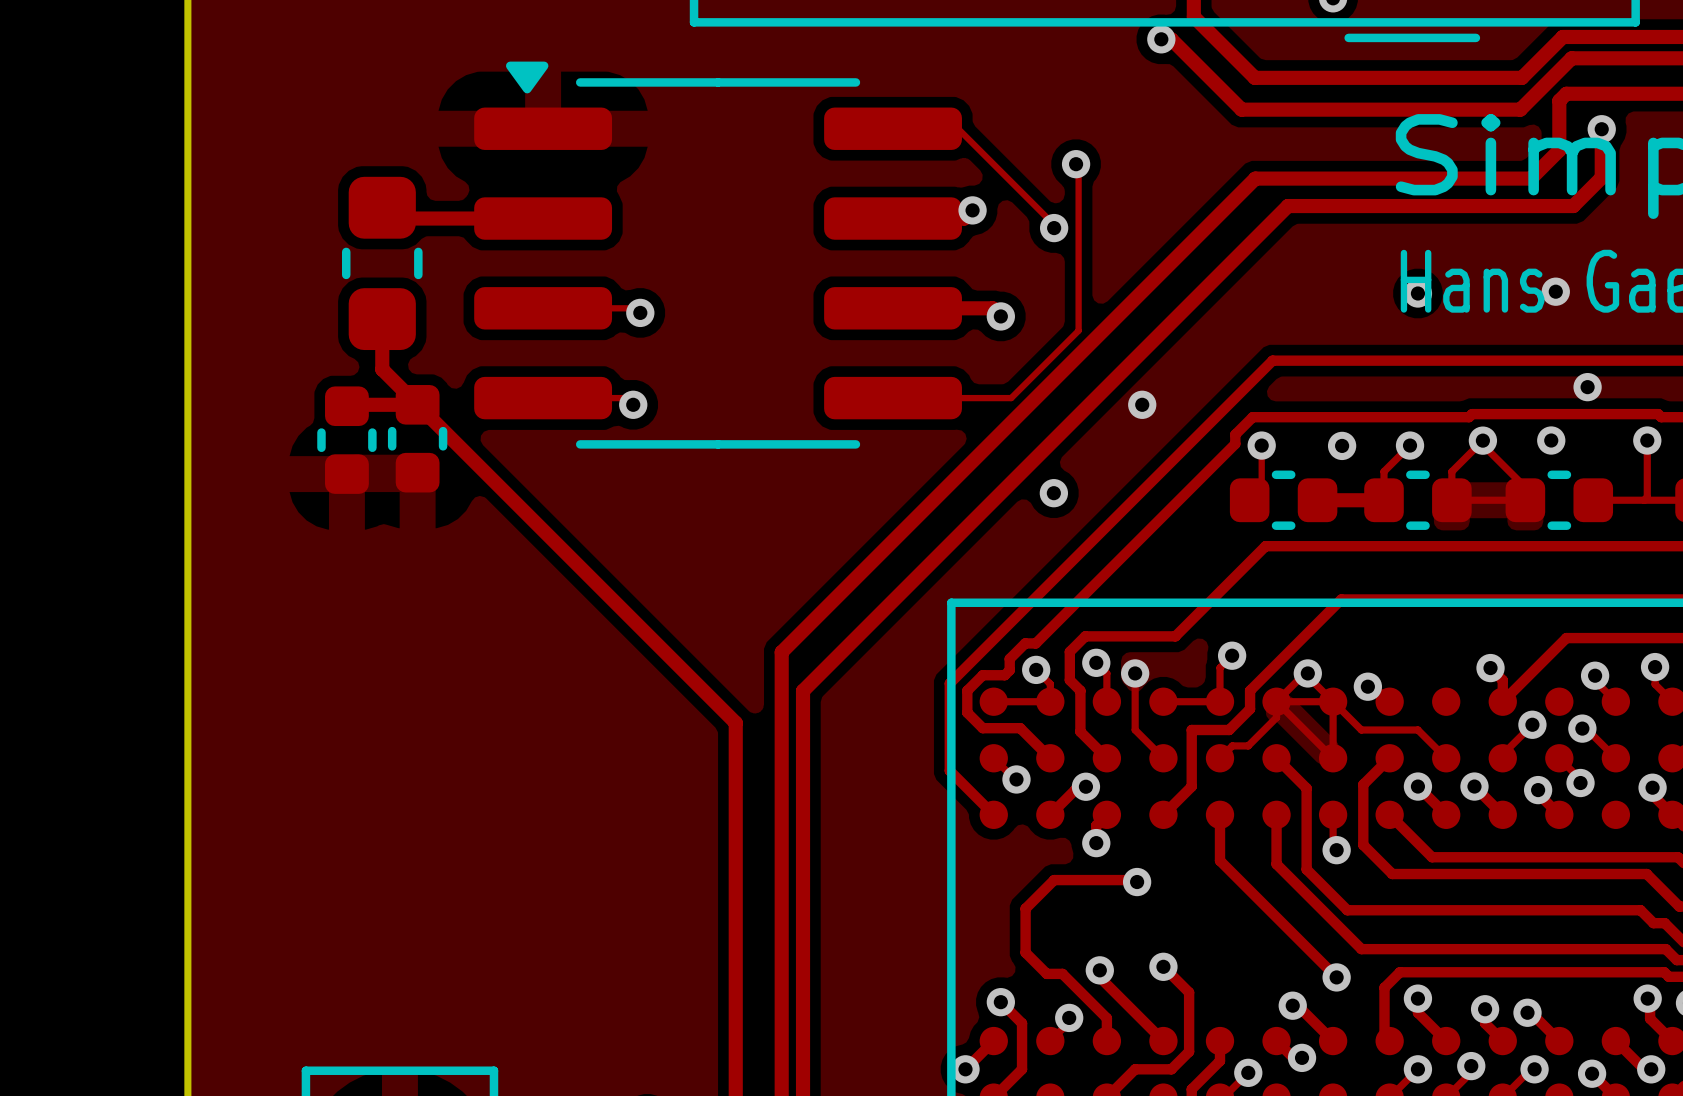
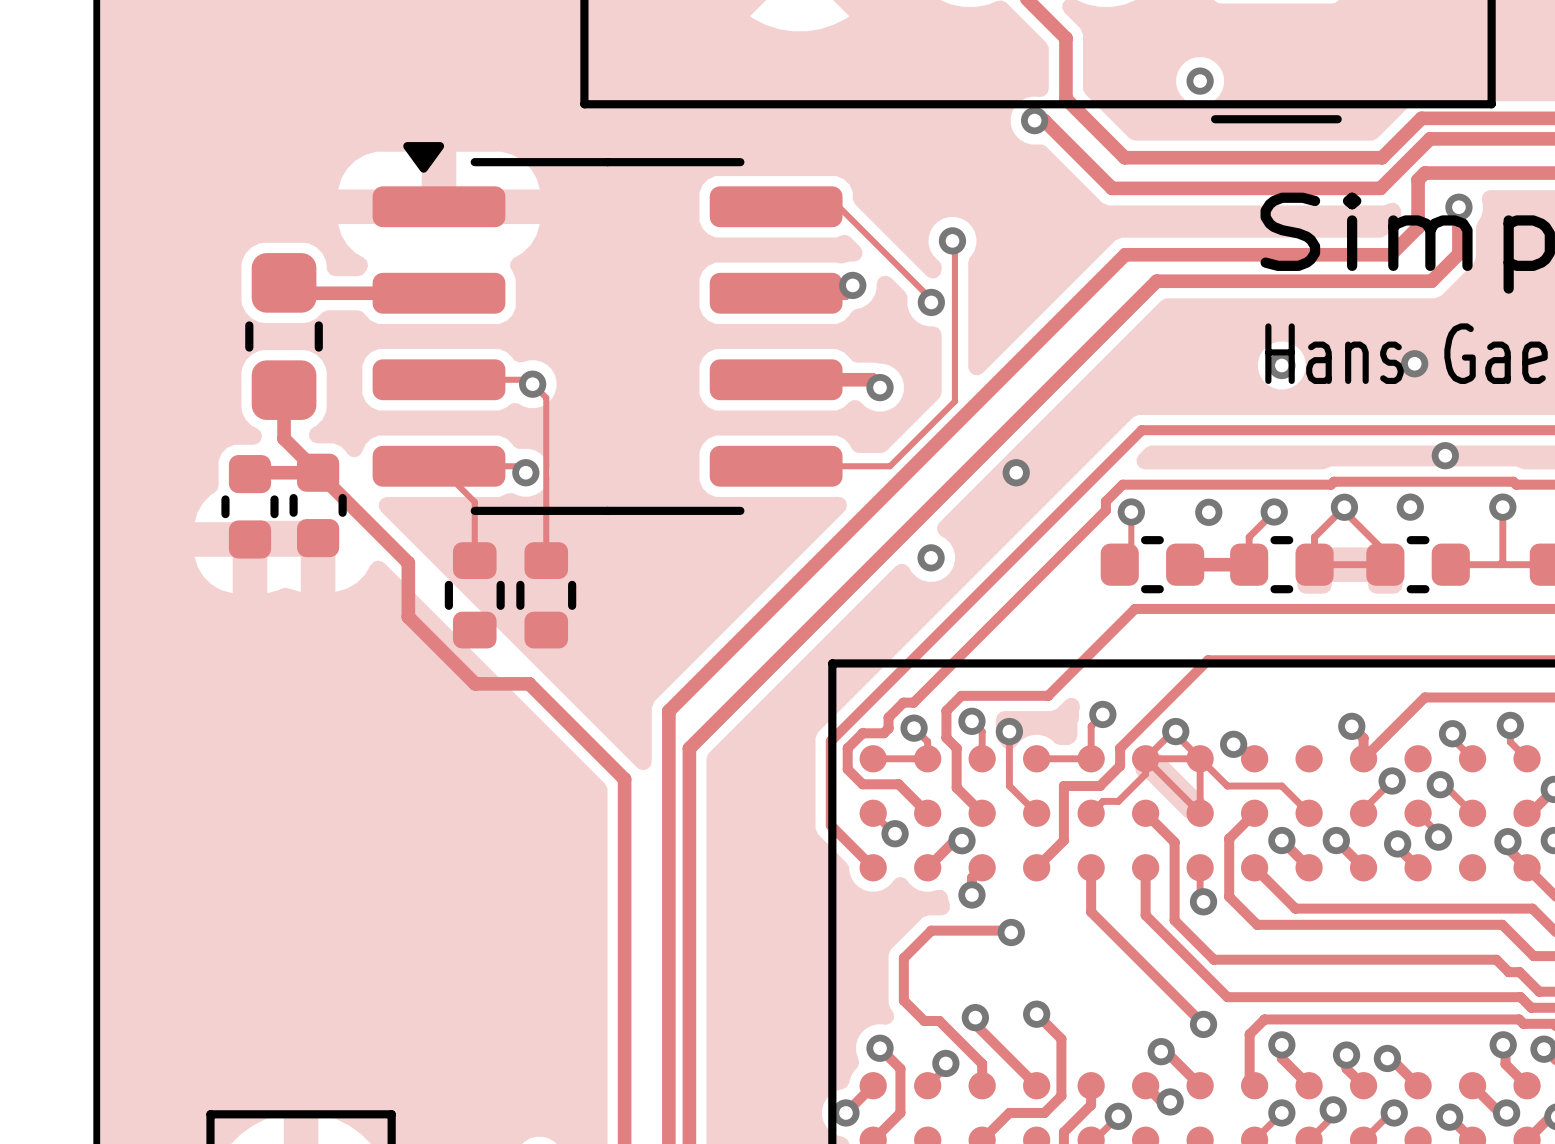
track: none -> (532, 384) (546, 397) (546, 560)
track: none -> (439, 466) (474, 502) (474, 560)
track: (511, 498) (636, 623) -> (408, 562) (408, 617) (475, 683) (529, 683)
part: none -> (474, 595)
part: none -> (546, 595)

